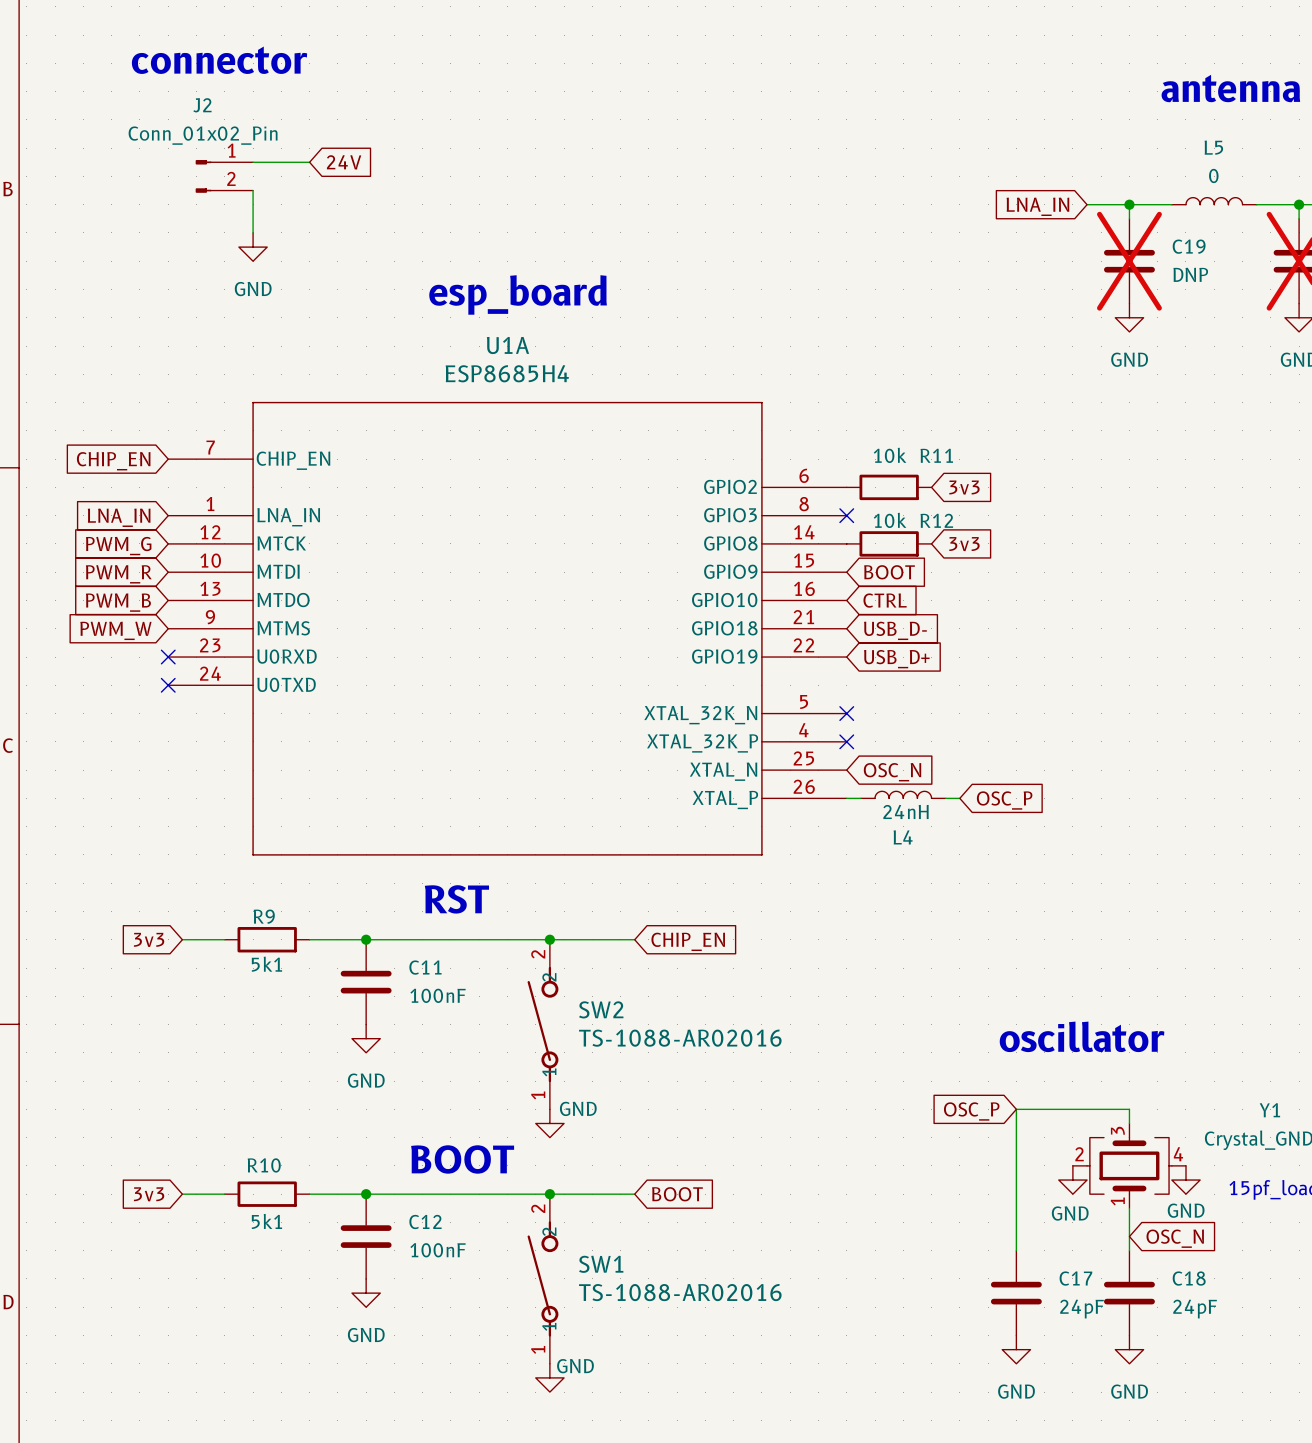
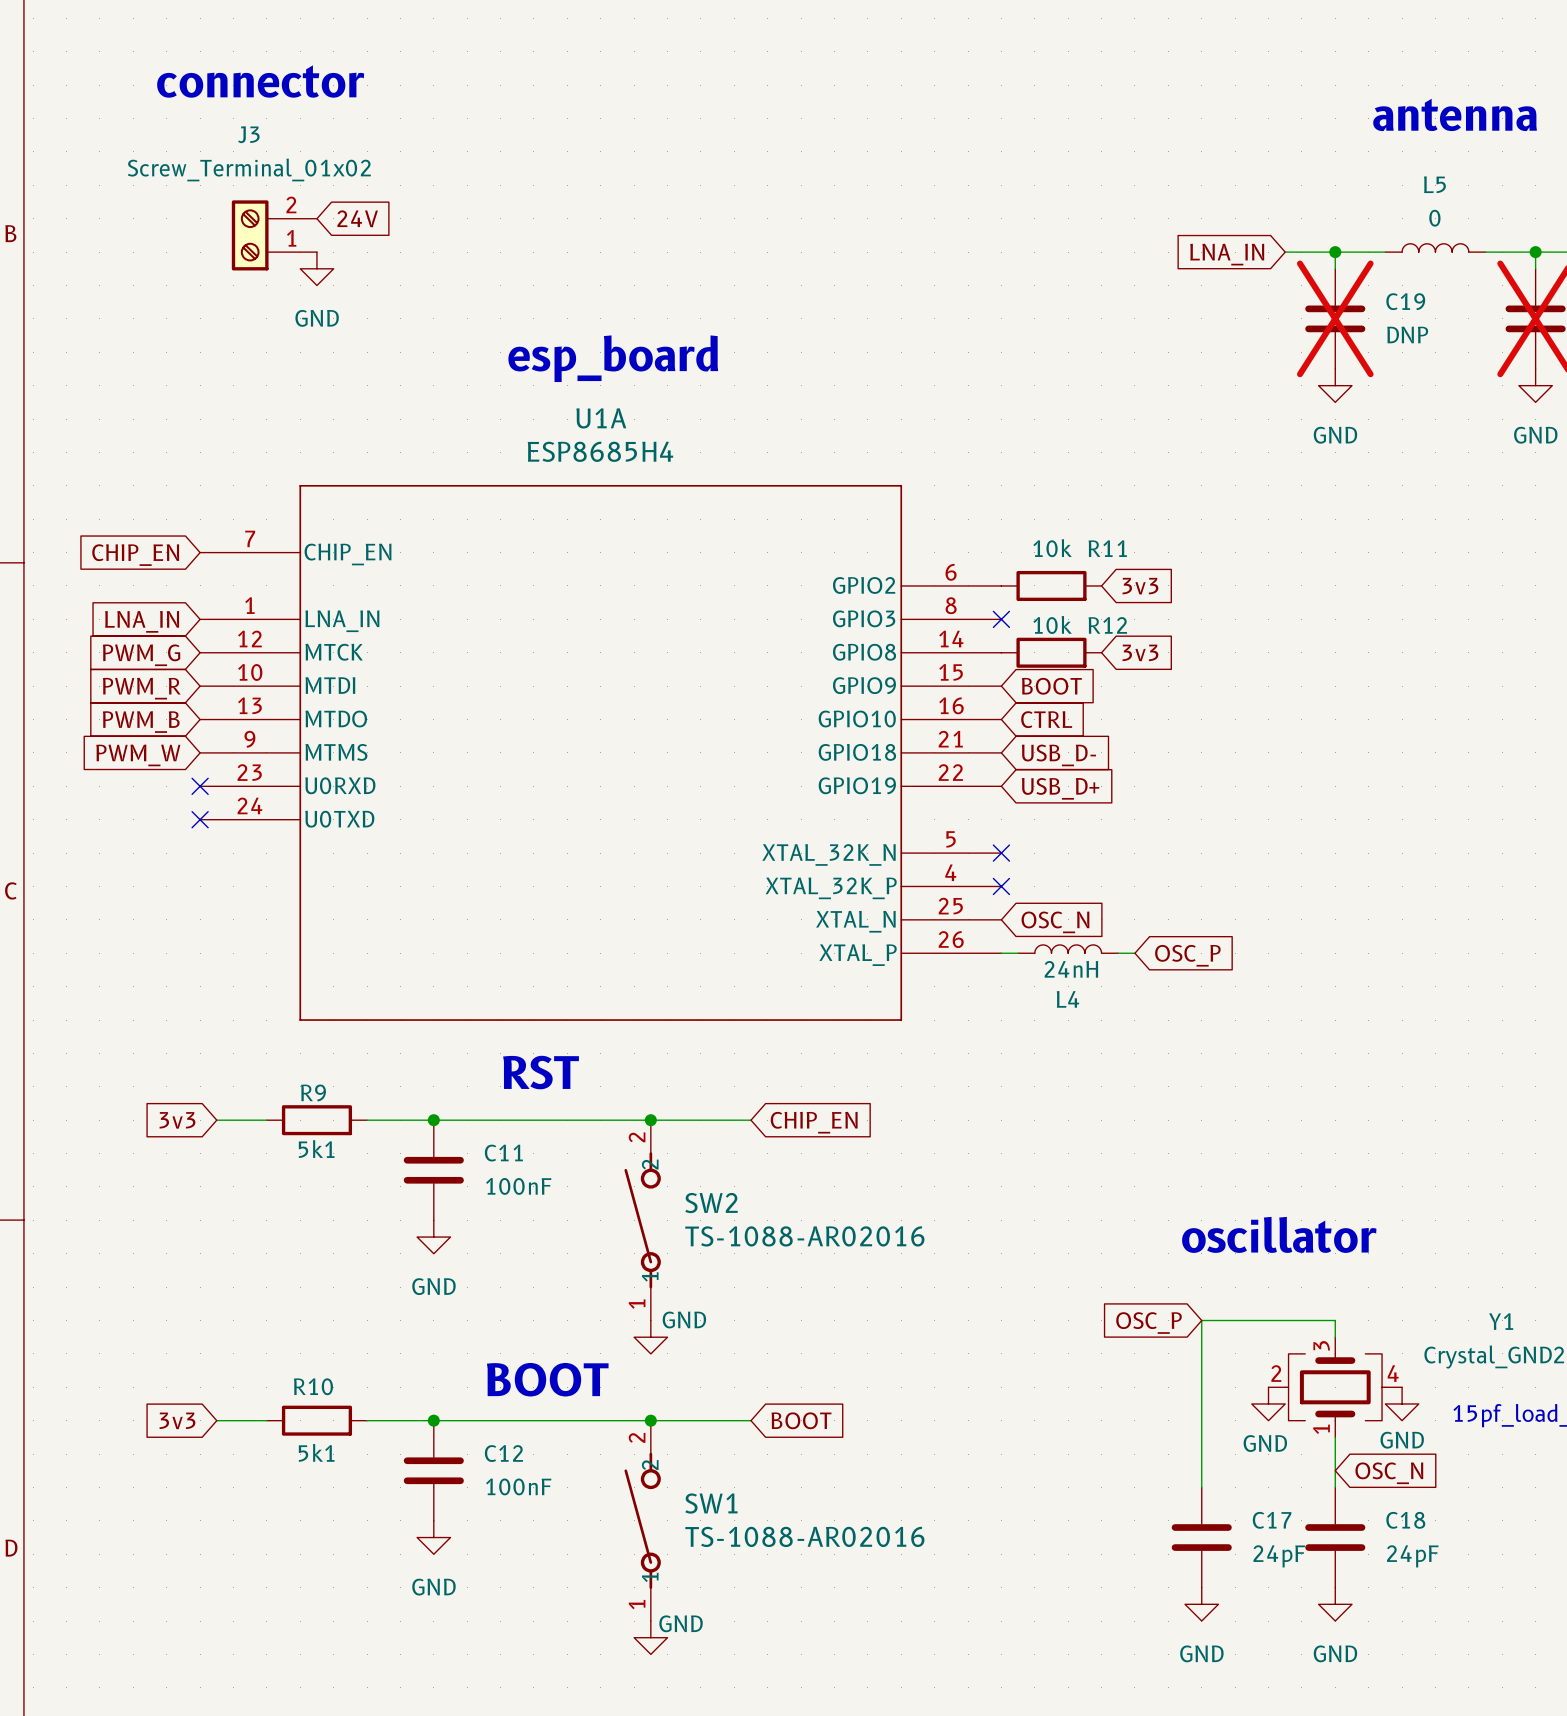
wire: (253, 162) (309, 162) -> none
global label position: 24V (344, 162) -> 24V (357, 218)
J2: Conn_01x02_Pin (224, 176) -> none
J3: none -> Screw_Terminal_01x02 (274, 235)
wire: (253, 190) (253, 232) -> none
power symbol position: GND (253, 247) -> GND (316, 268)

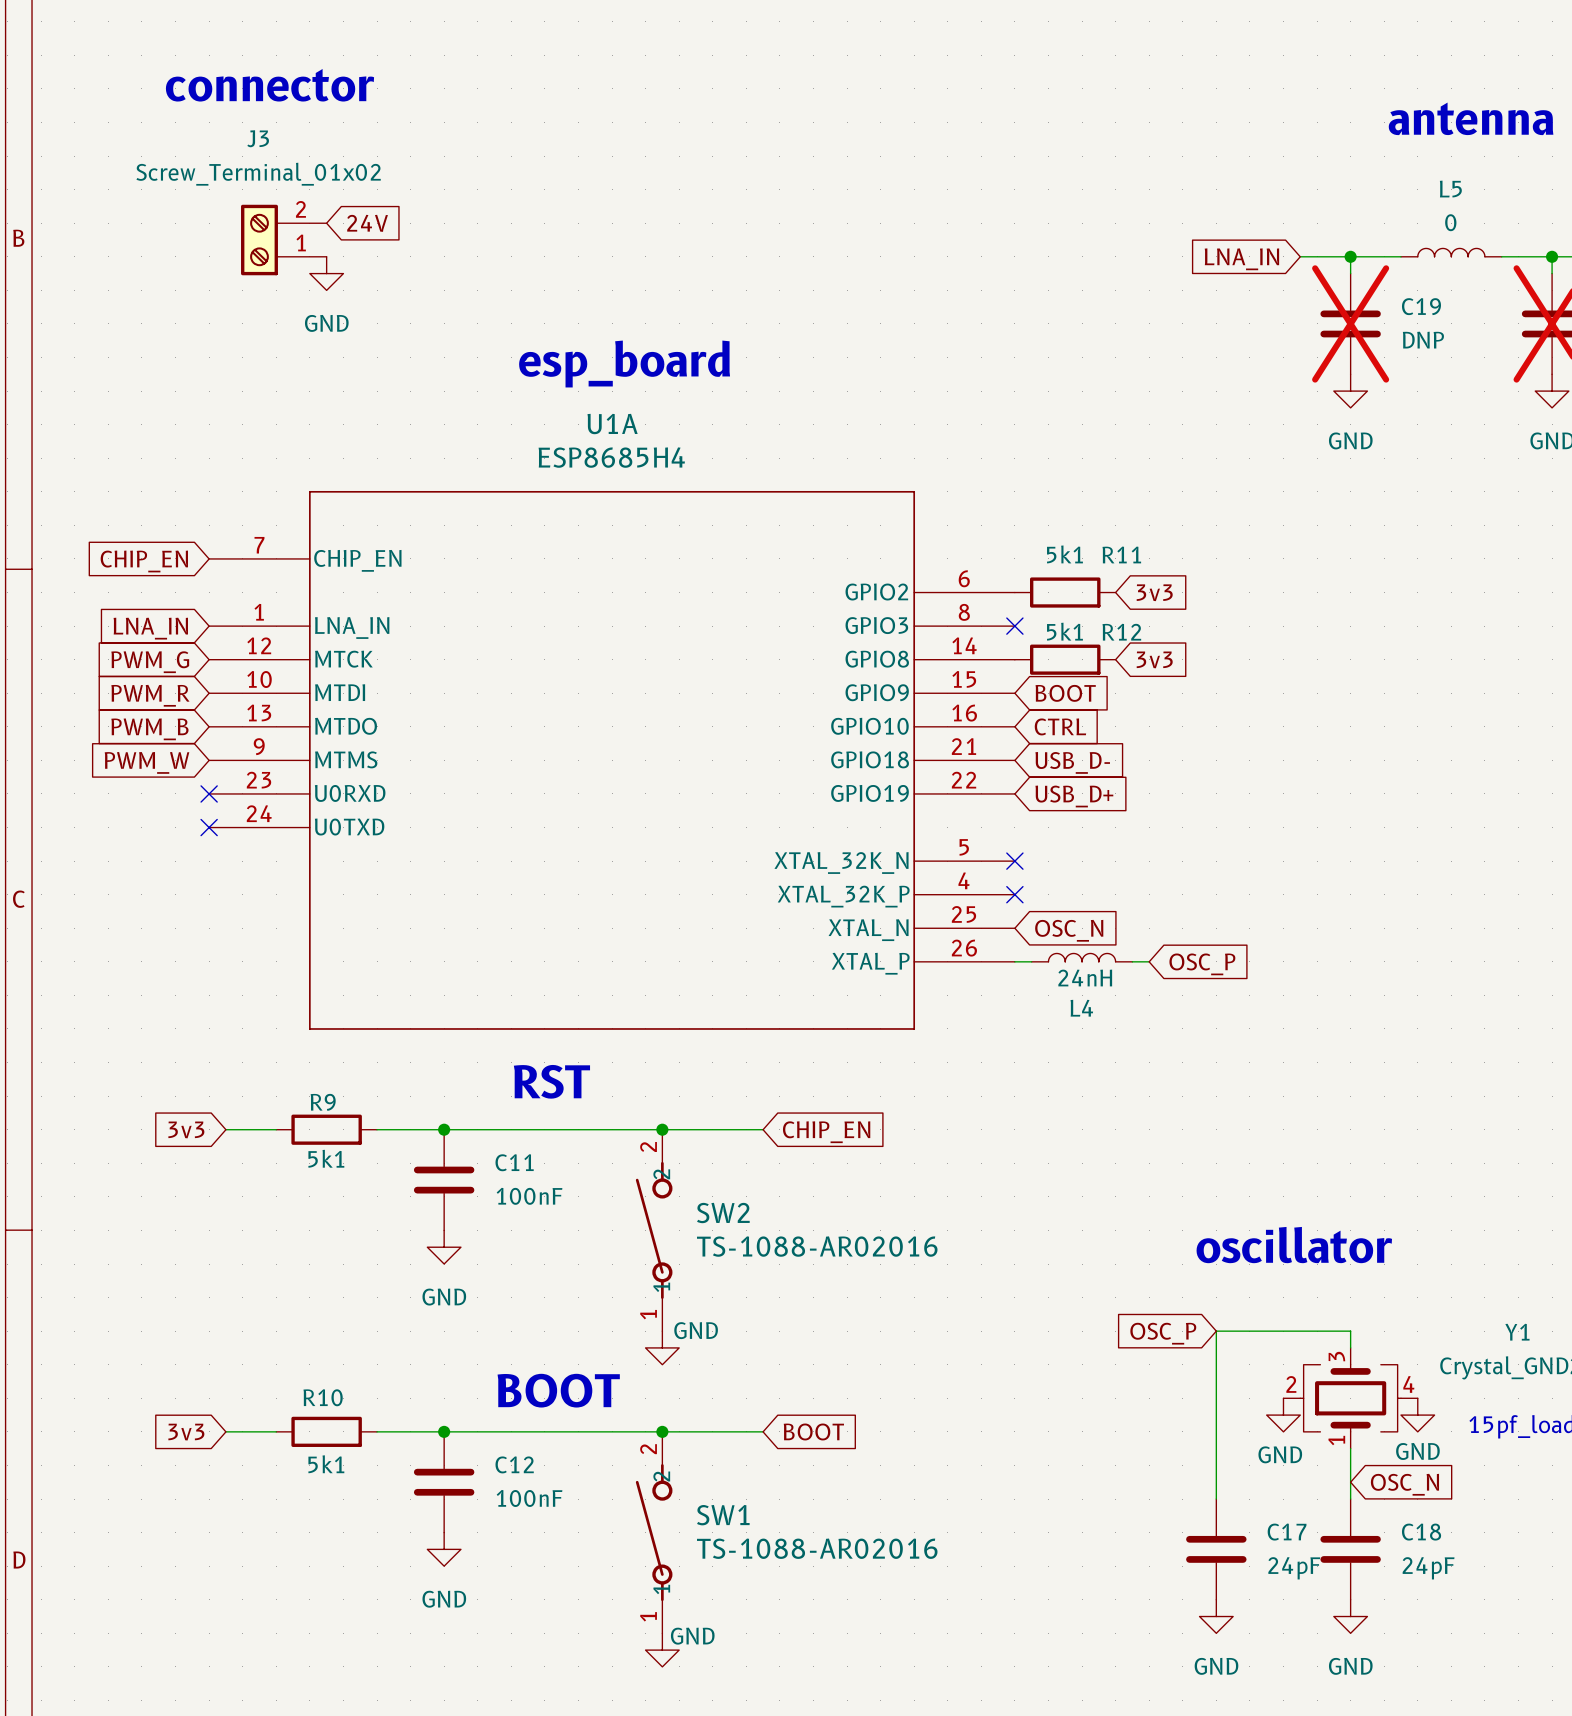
R11 value: 10k (1052, 548) -> 5k1 (1064, 554)
R12 value: 10k (1052, 624) -> 5k1 (1064, 631)

